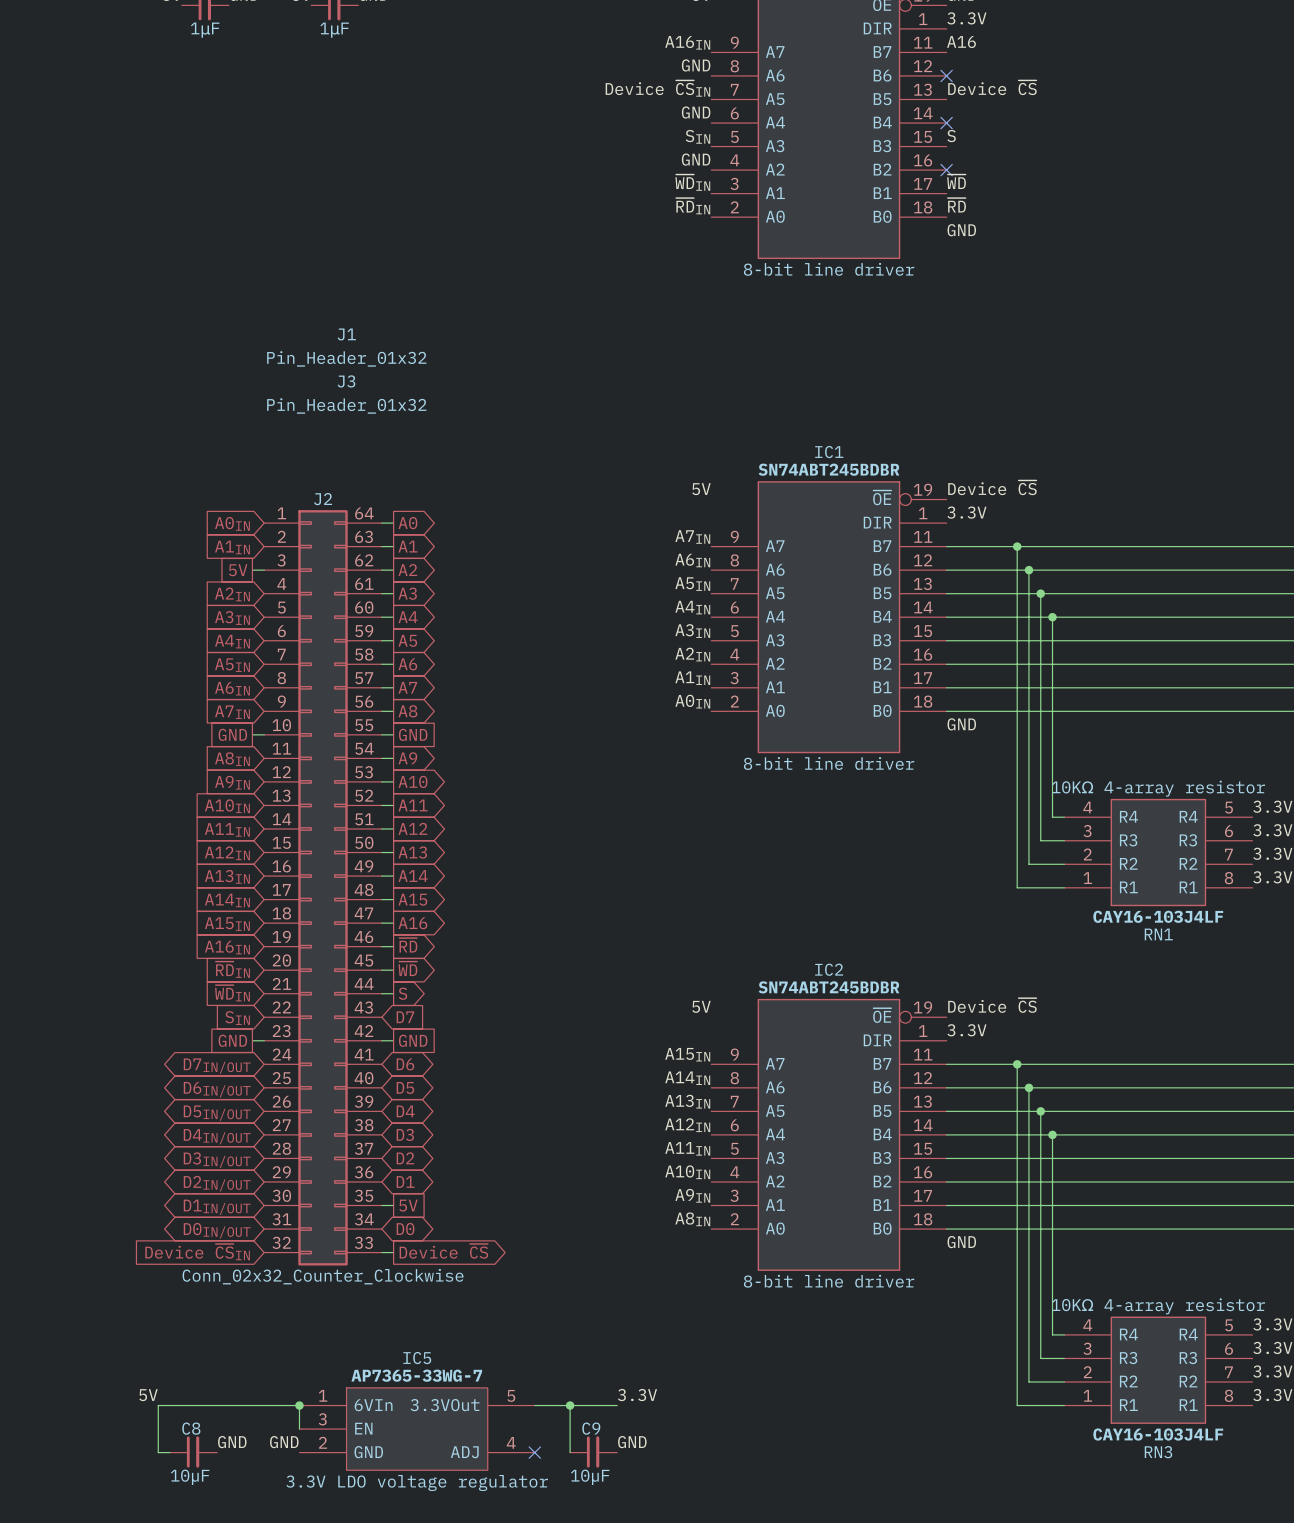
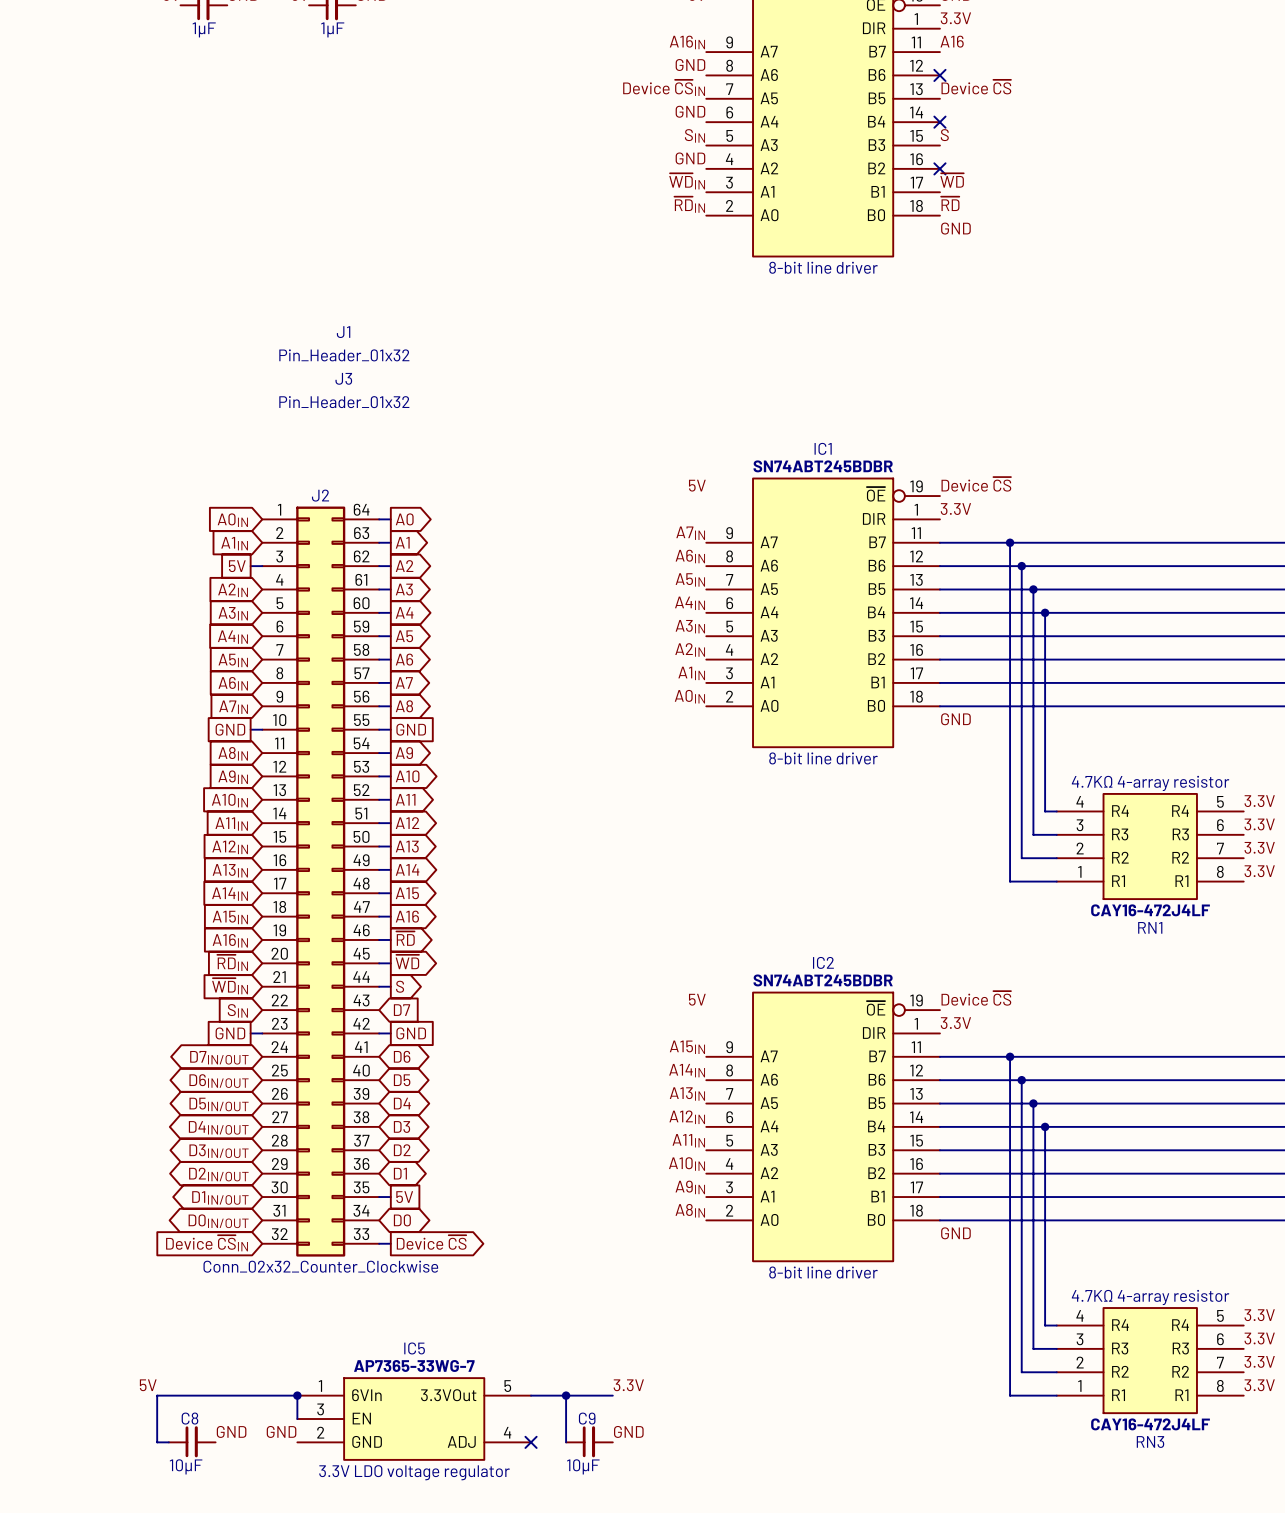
RN1 text: 10KΩ 4-array resistor (1158, 788) -> 4.7KΩ 4-array resistor (1150, 783)
RN1 value: CAY16-103J4LF (1158, 916) -> CAY16-472J4LF (1150, 910)
RN3 text: 10KΩ 4-array resistor (1158, 1306) -> 4.7KΩ 4-array resistor (1150, 1297)
RN3 value: CAY16-103J4LF (1158, 1434) -> CAY16-472J4LF (1150, 1424)

